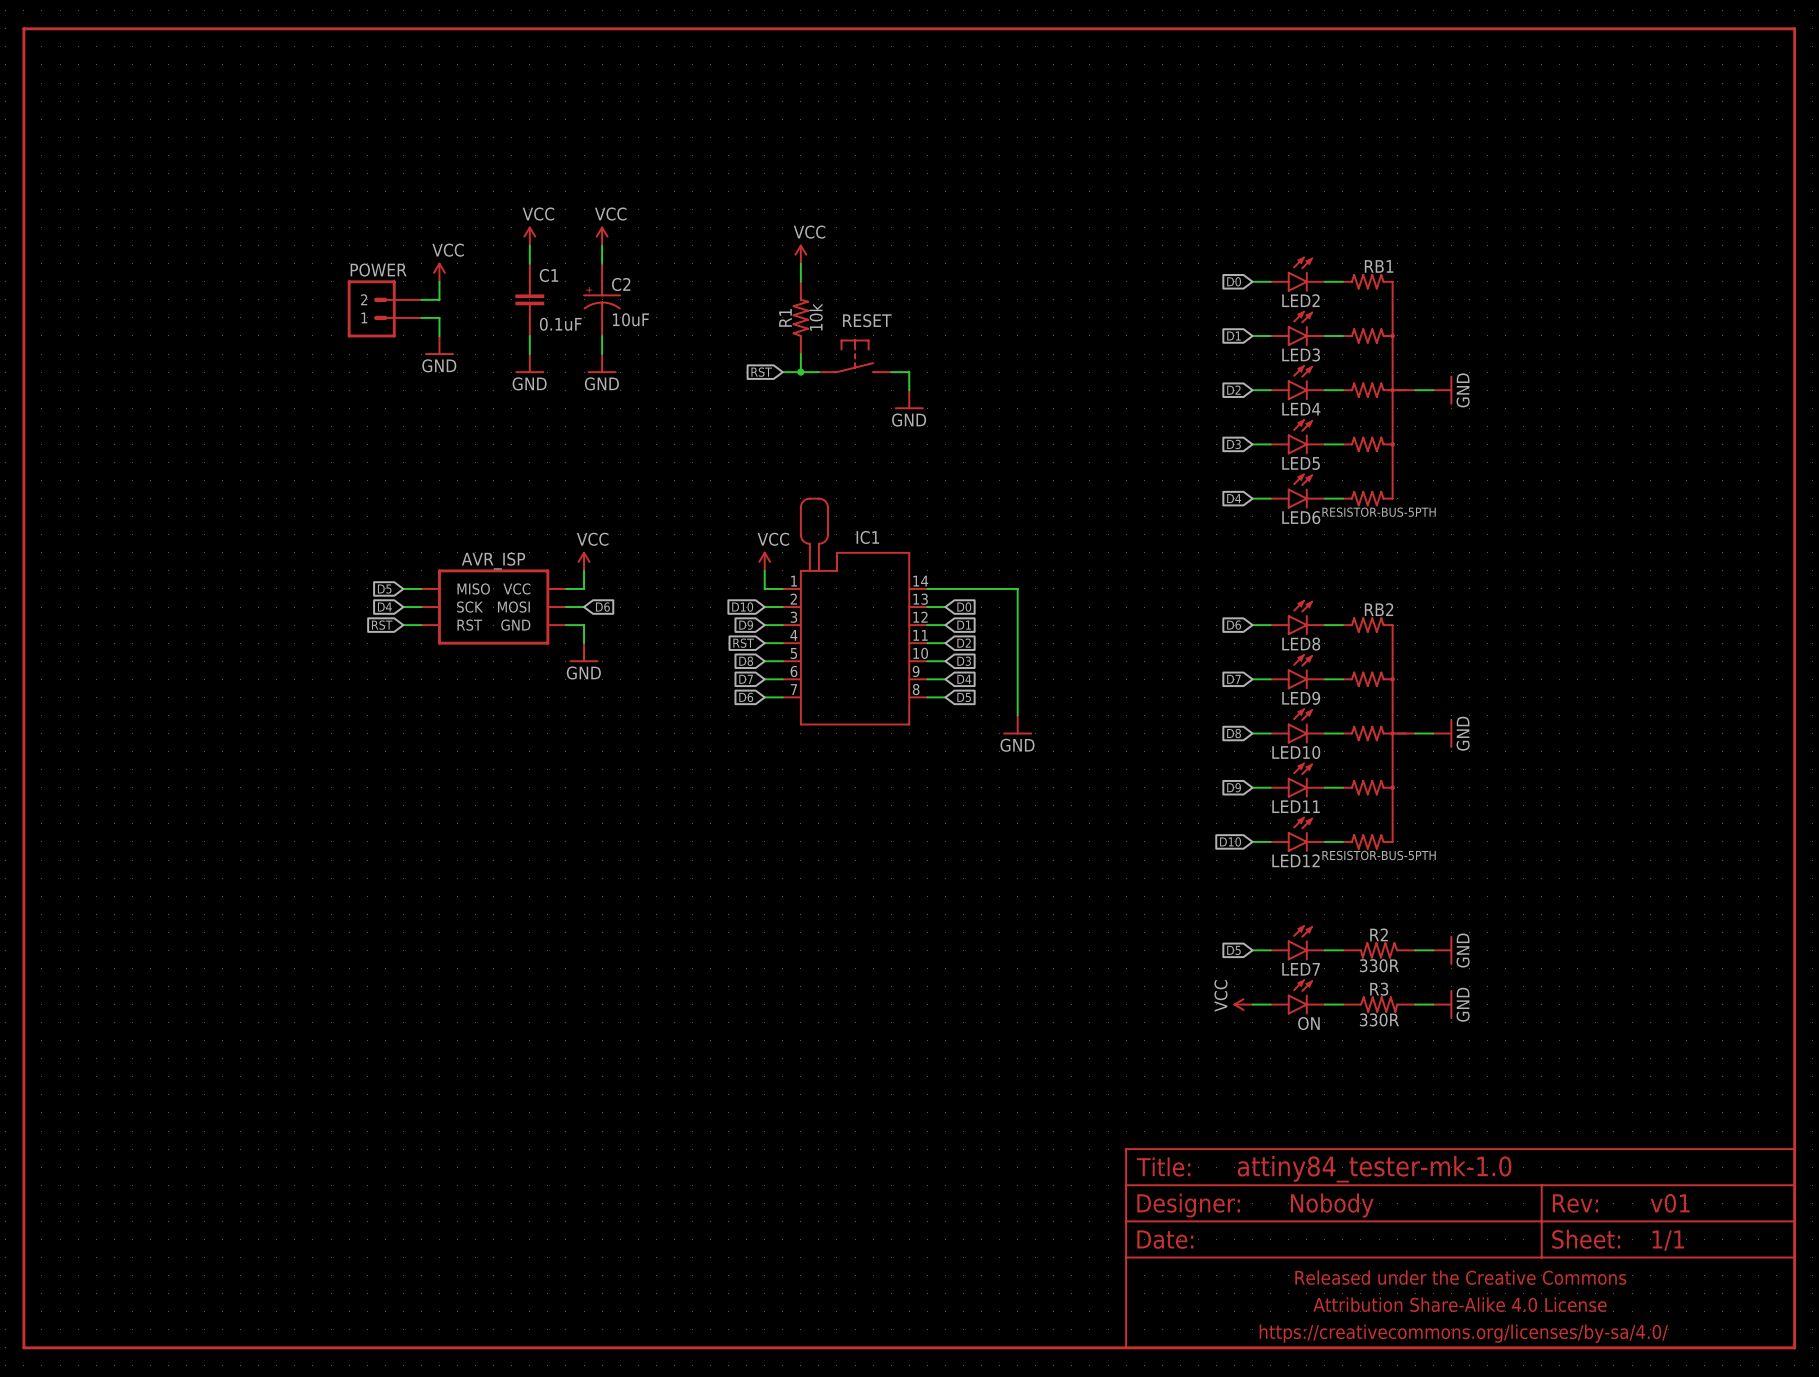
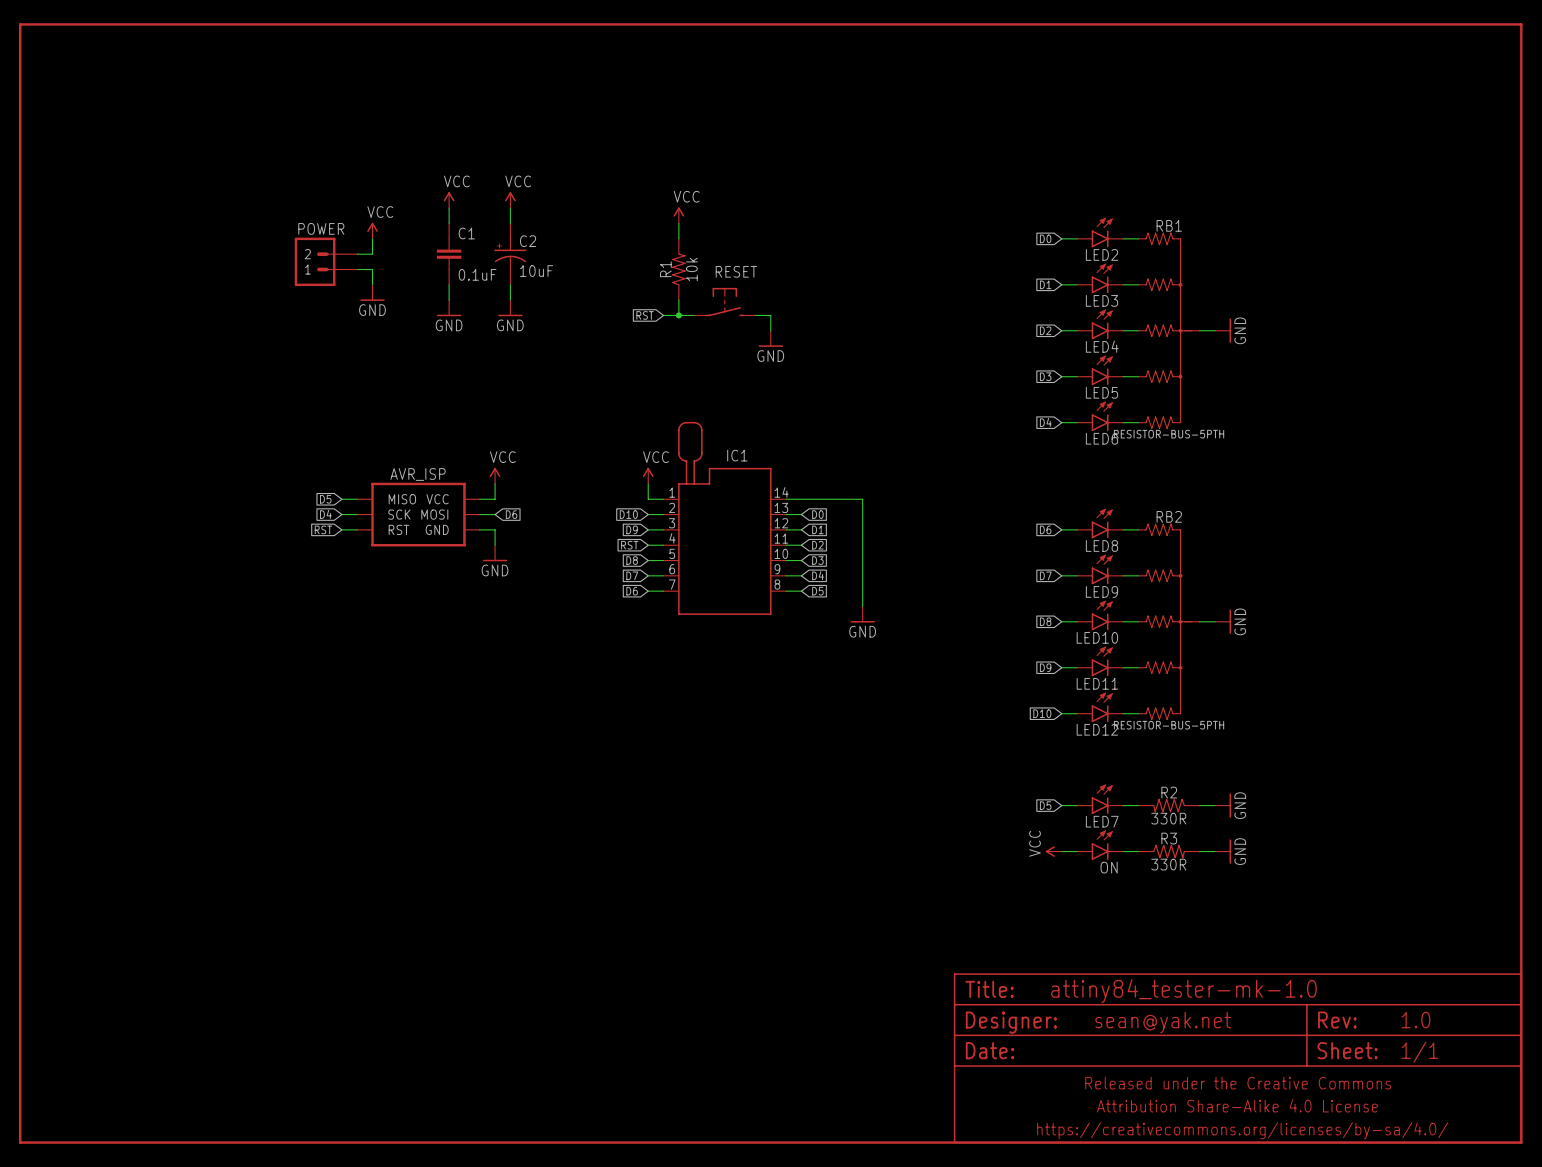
part text: v01 (1670, 1203) -> 1.0 (1415, 1020)
part text: Nobody (1332, 1205) -> sean@yak.net (1163, 1022)

